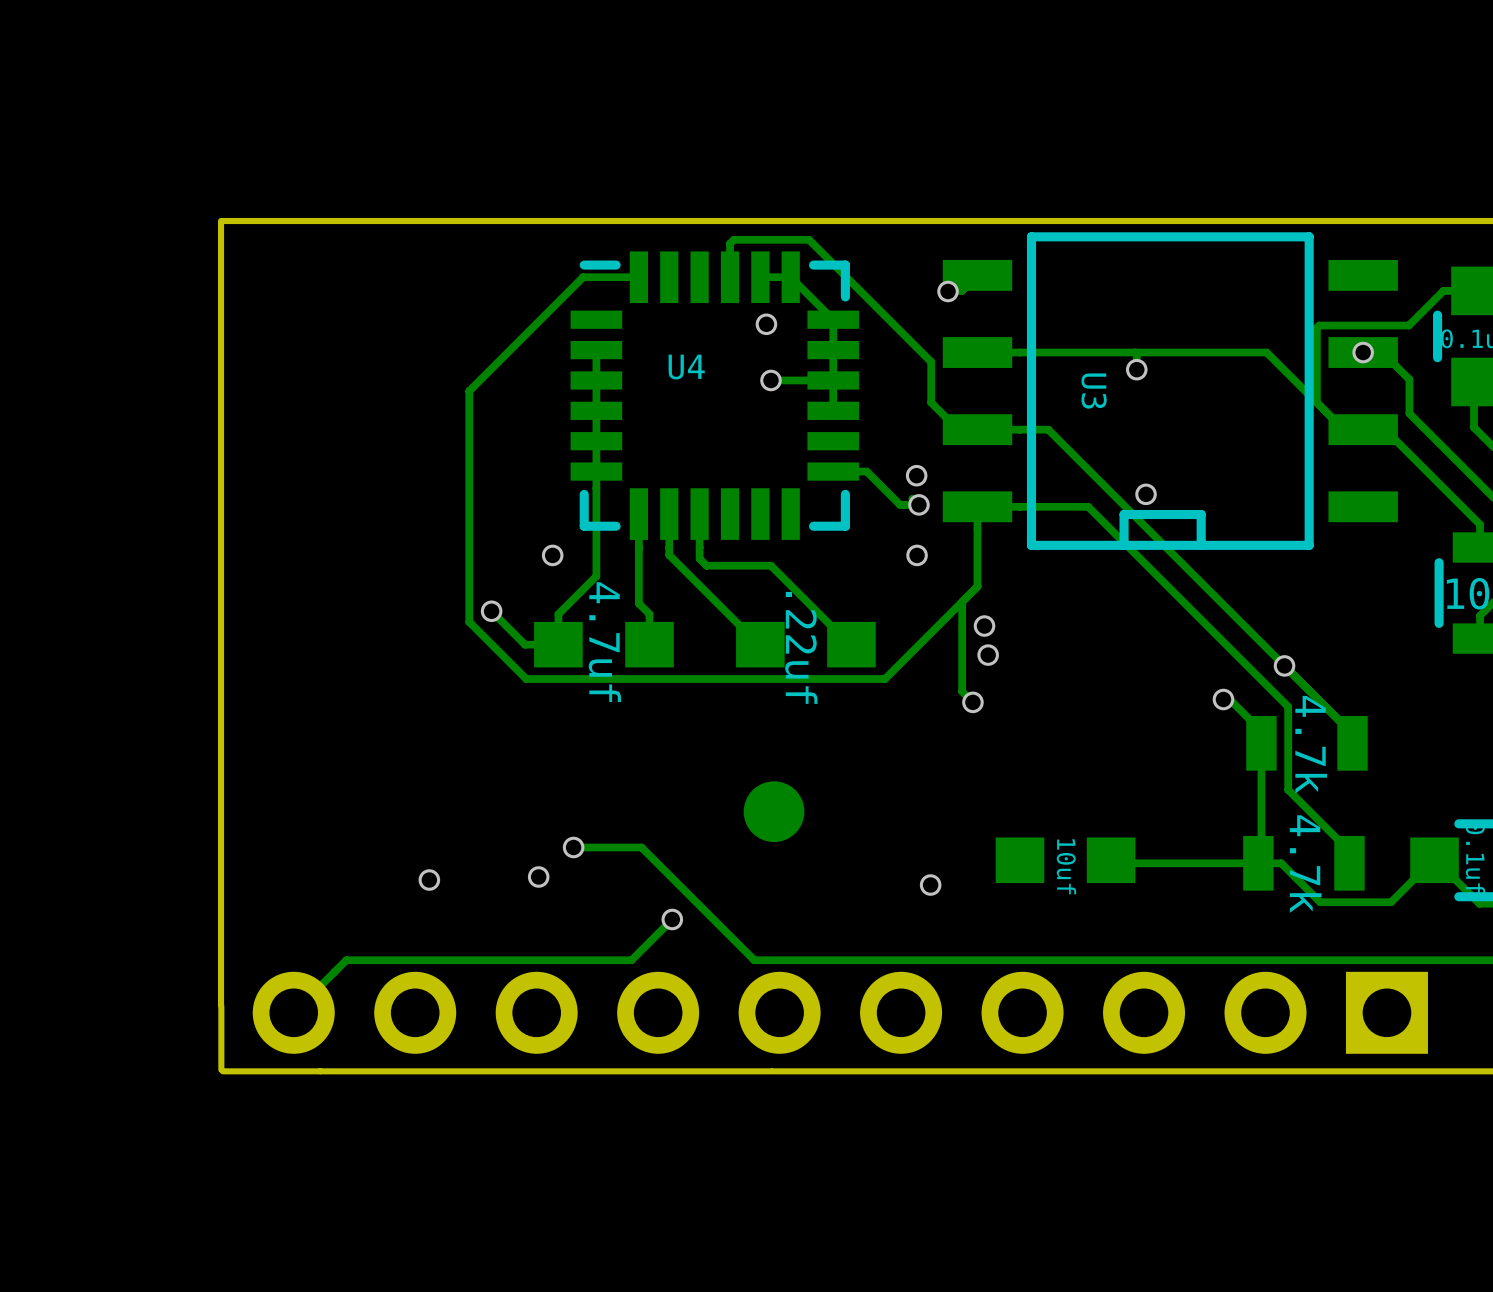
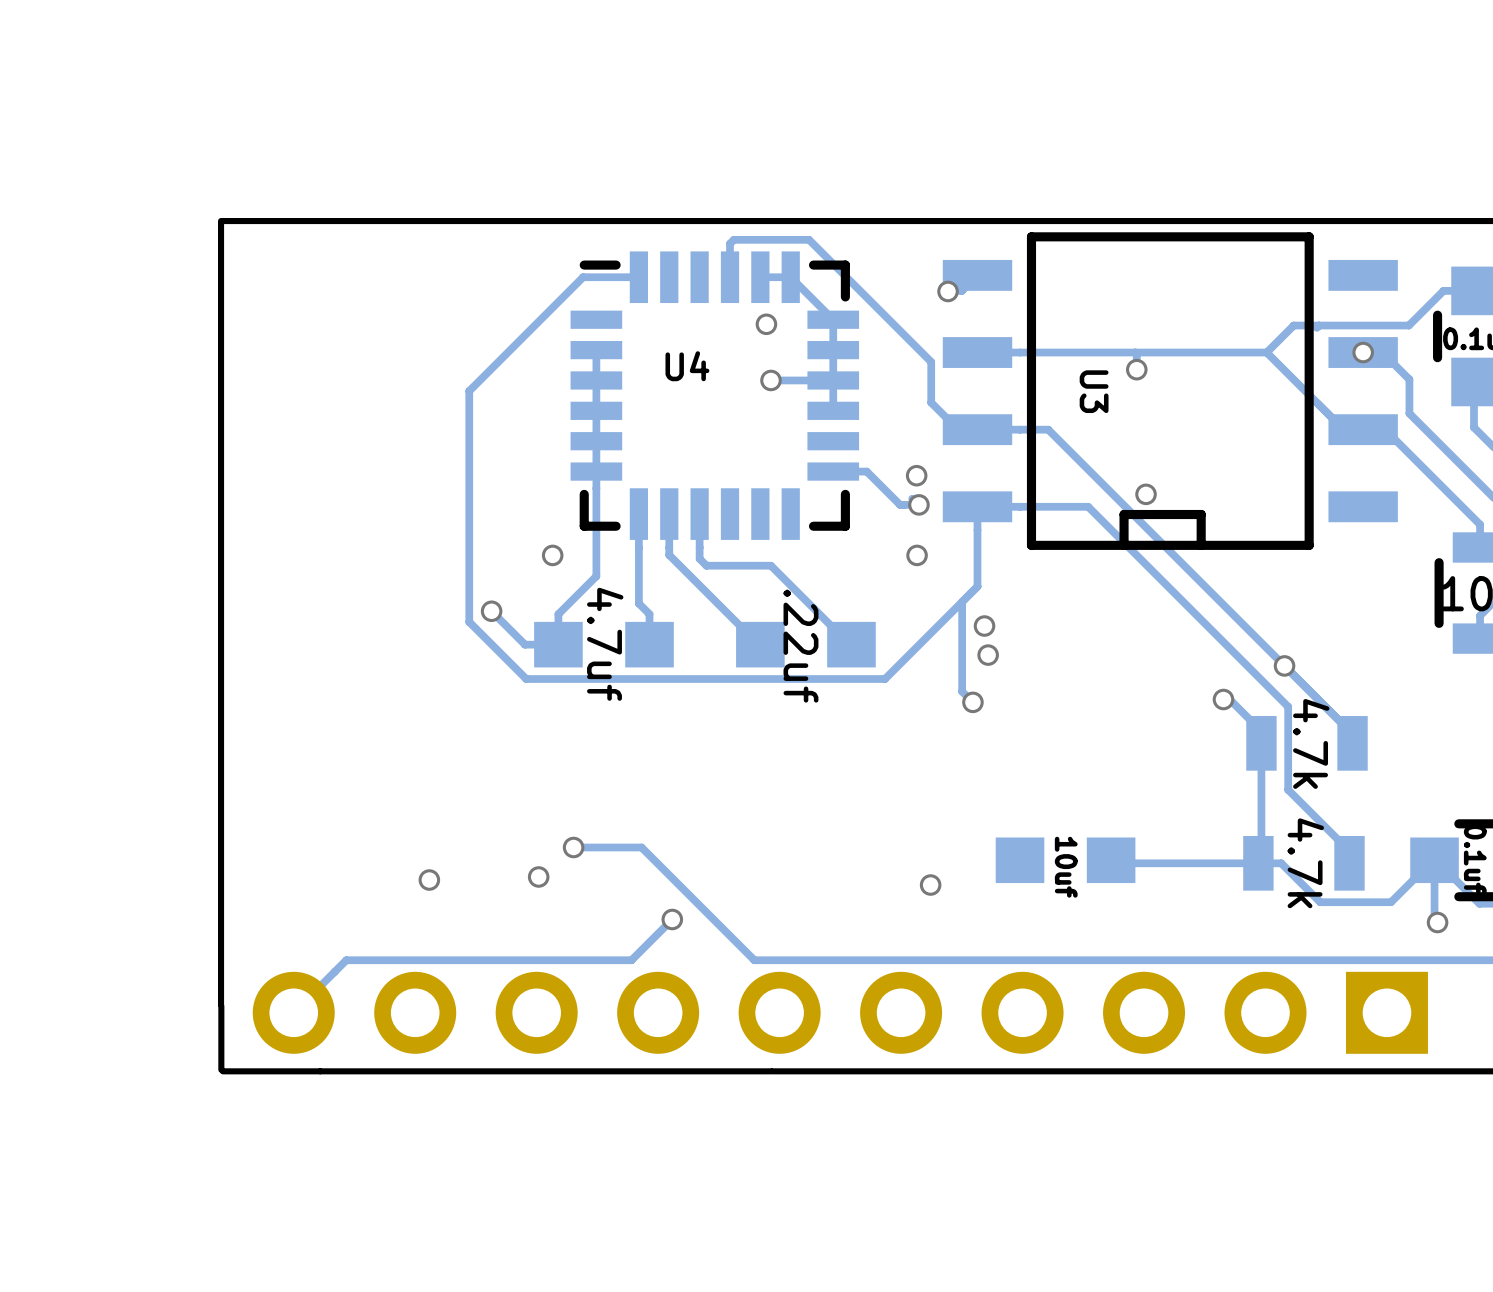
track: none -> (1319, 325) (1293, 325) (1266, 352)
track: (1316, 327) (1316, 402) -> none
part: (774, 811) -> none
track: none -> (1434, 860) (1434, 919) (1437, 922)
via: none -> (1437, 922)

